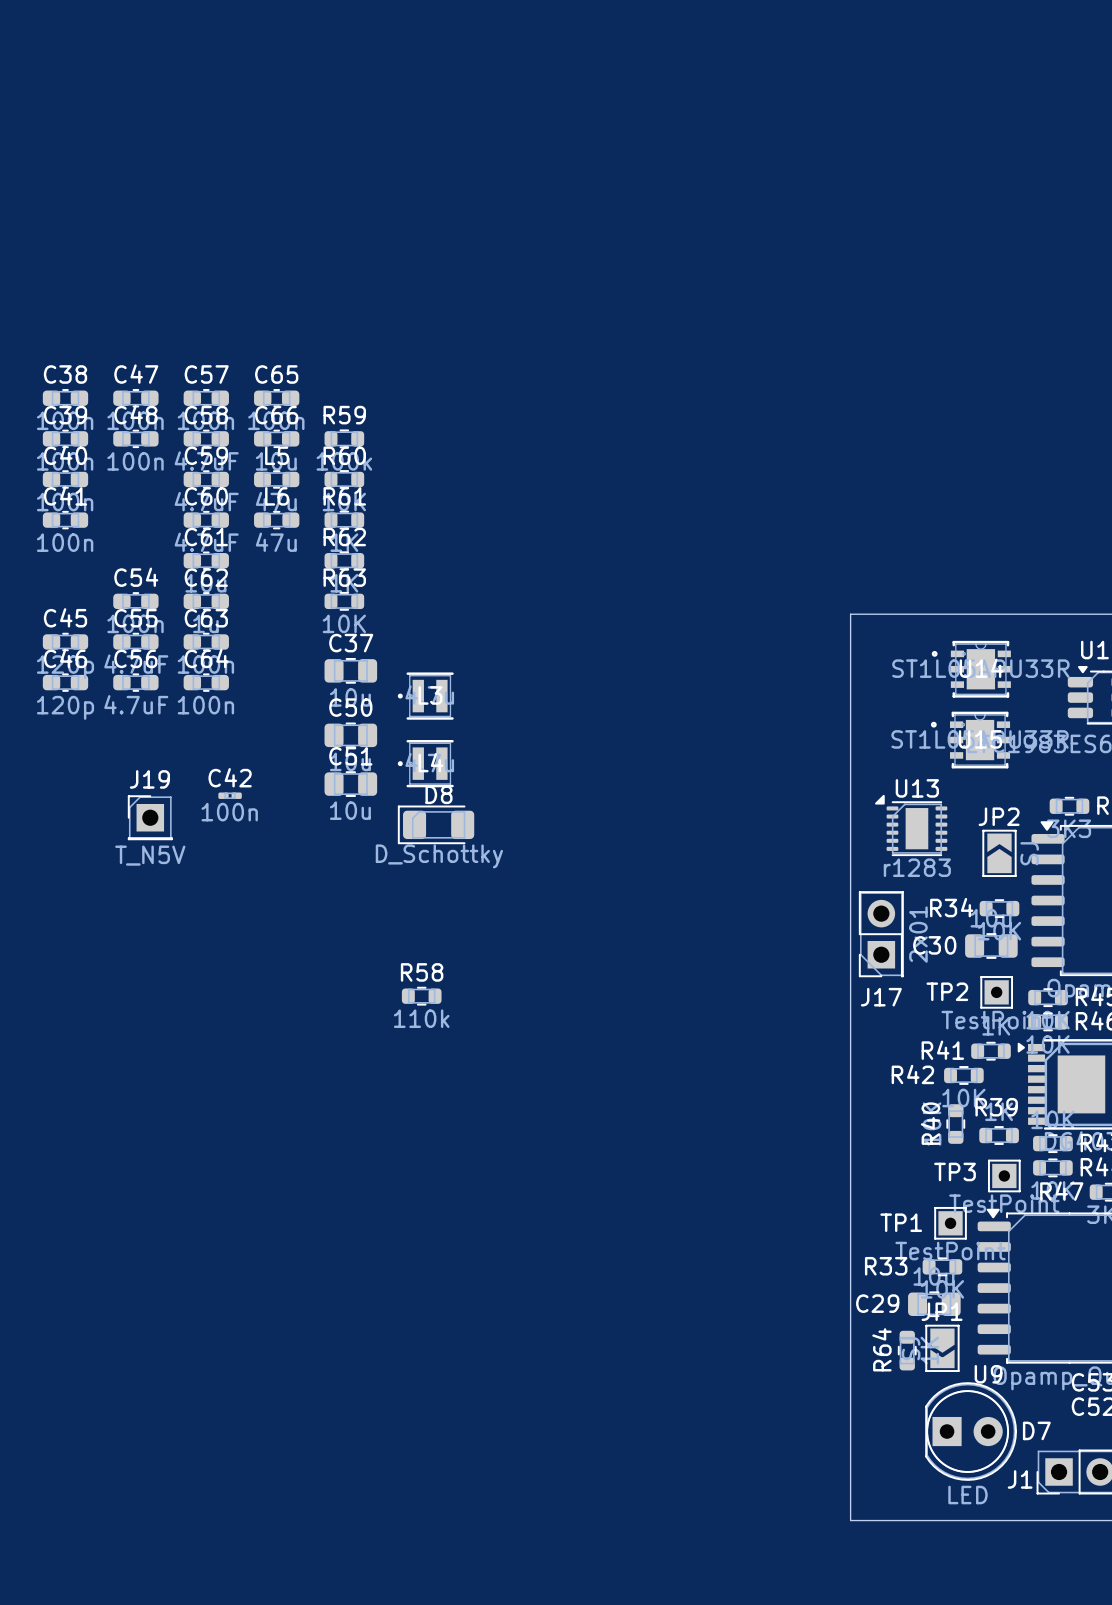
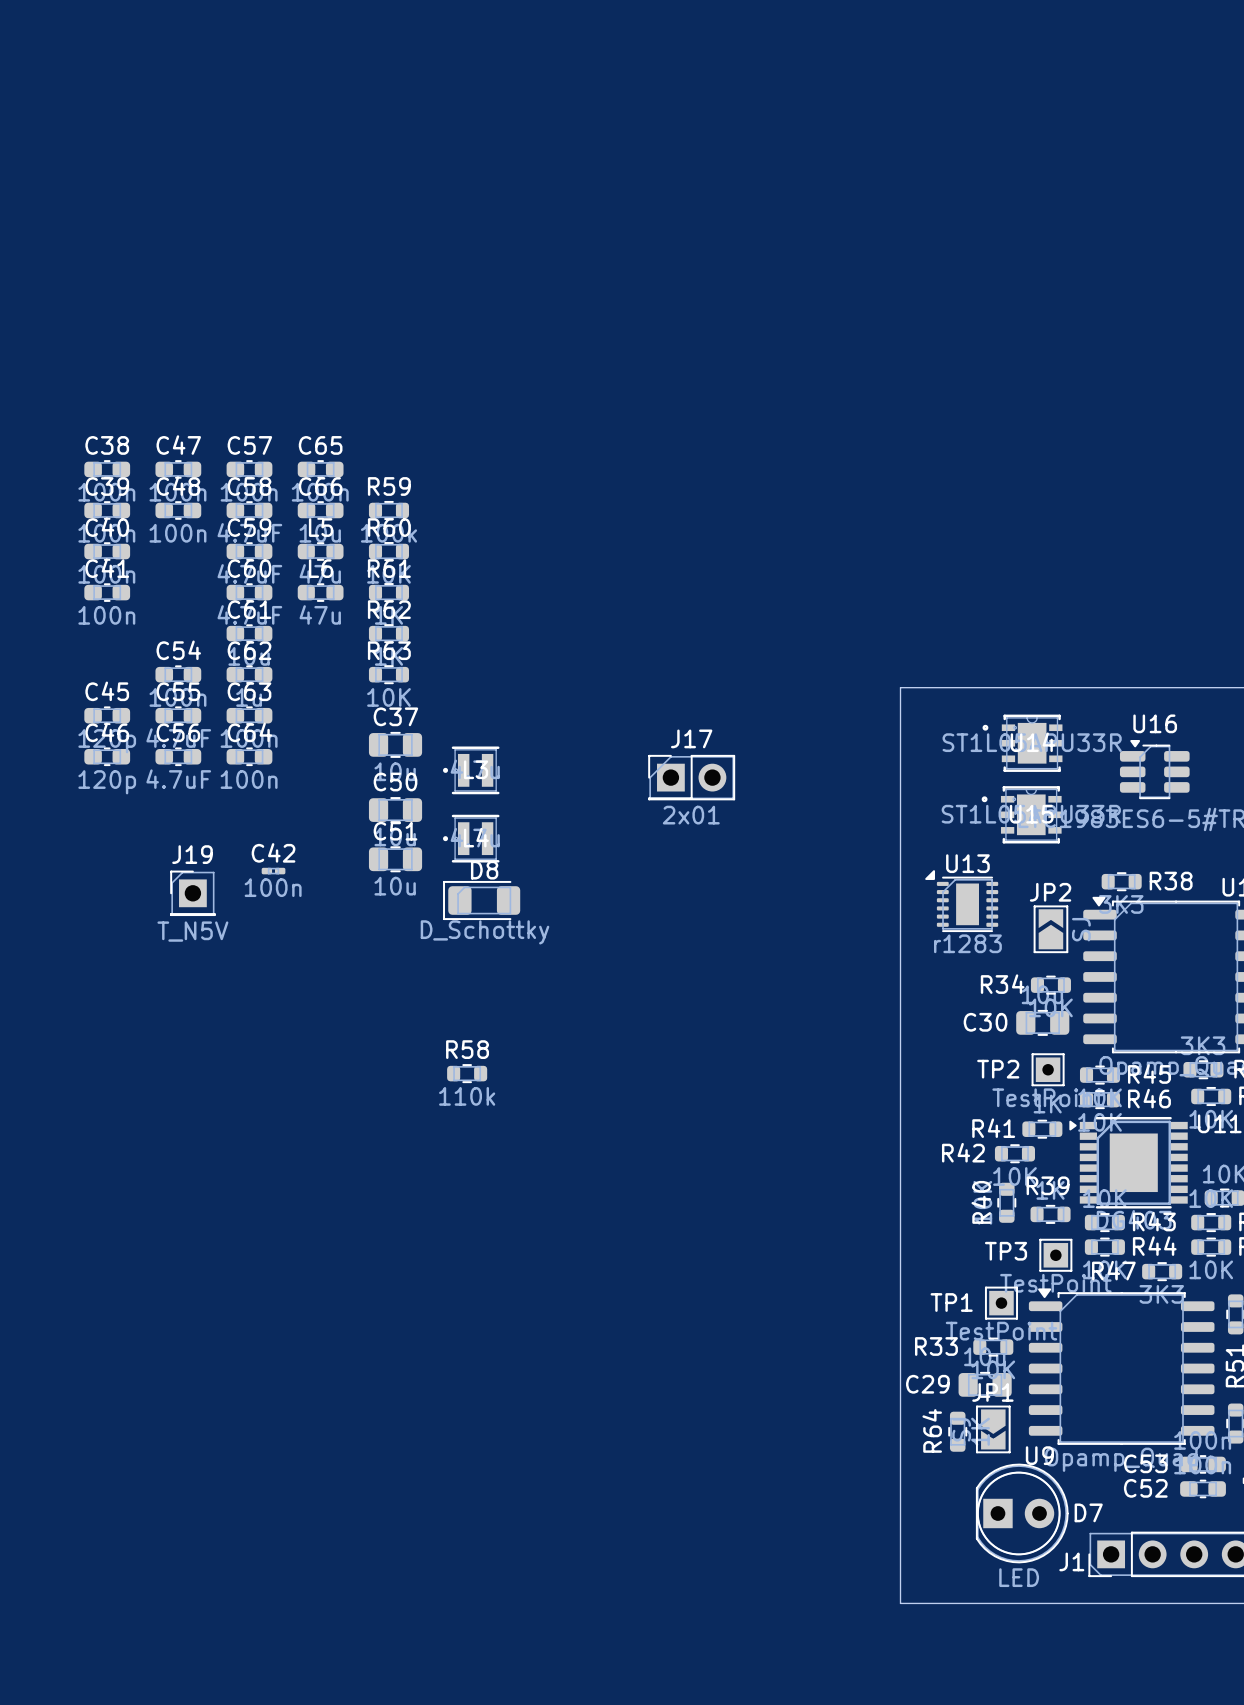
J17 rotation: 0° (881, 934) -> 90° clockwise (691, 777)
J17 position: (881, 934) -> (691, 777)
J17 name position: J17 (881, 997) -> J17 (691, 738)

